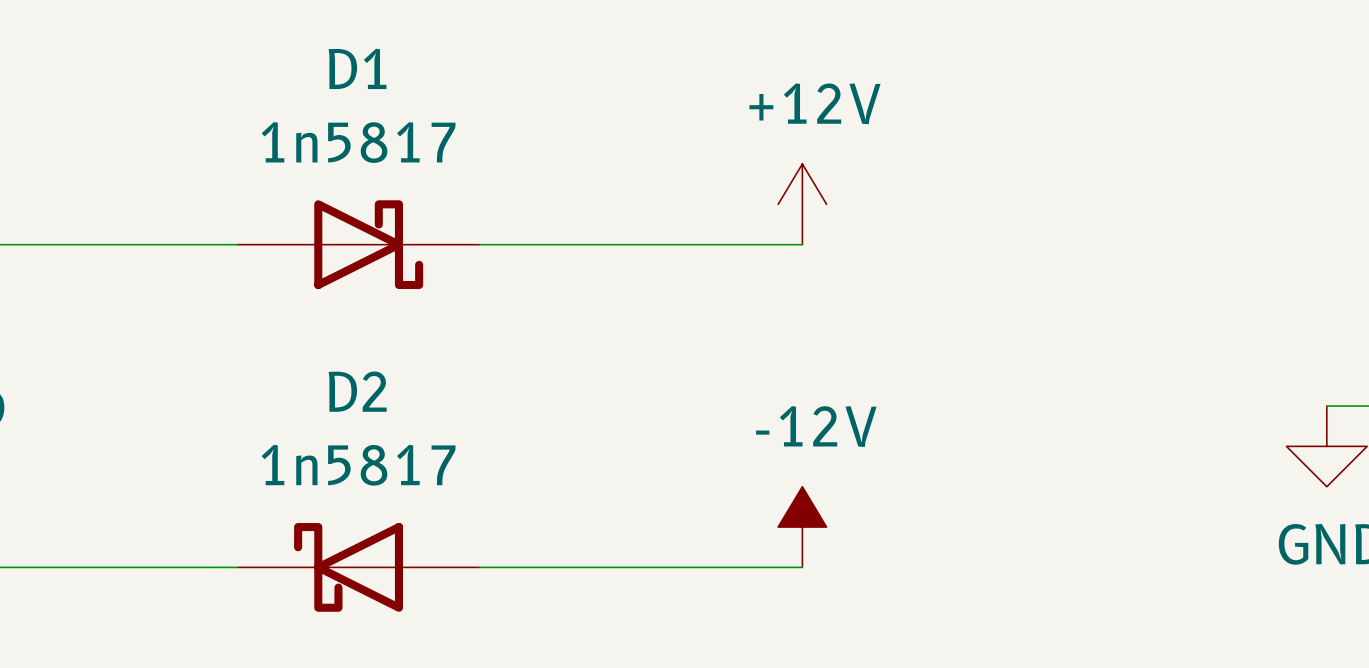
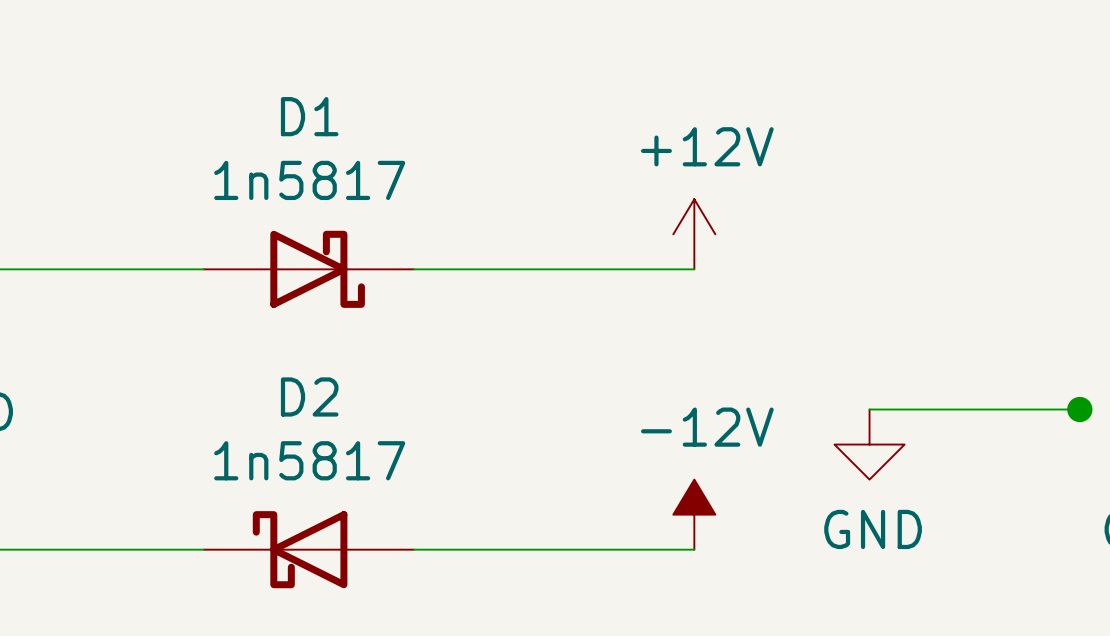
wire: none -> (869, 409) (1079, 409)
junction: none -> (1079, 409)
power symbol: none -> GND (869, 444)

